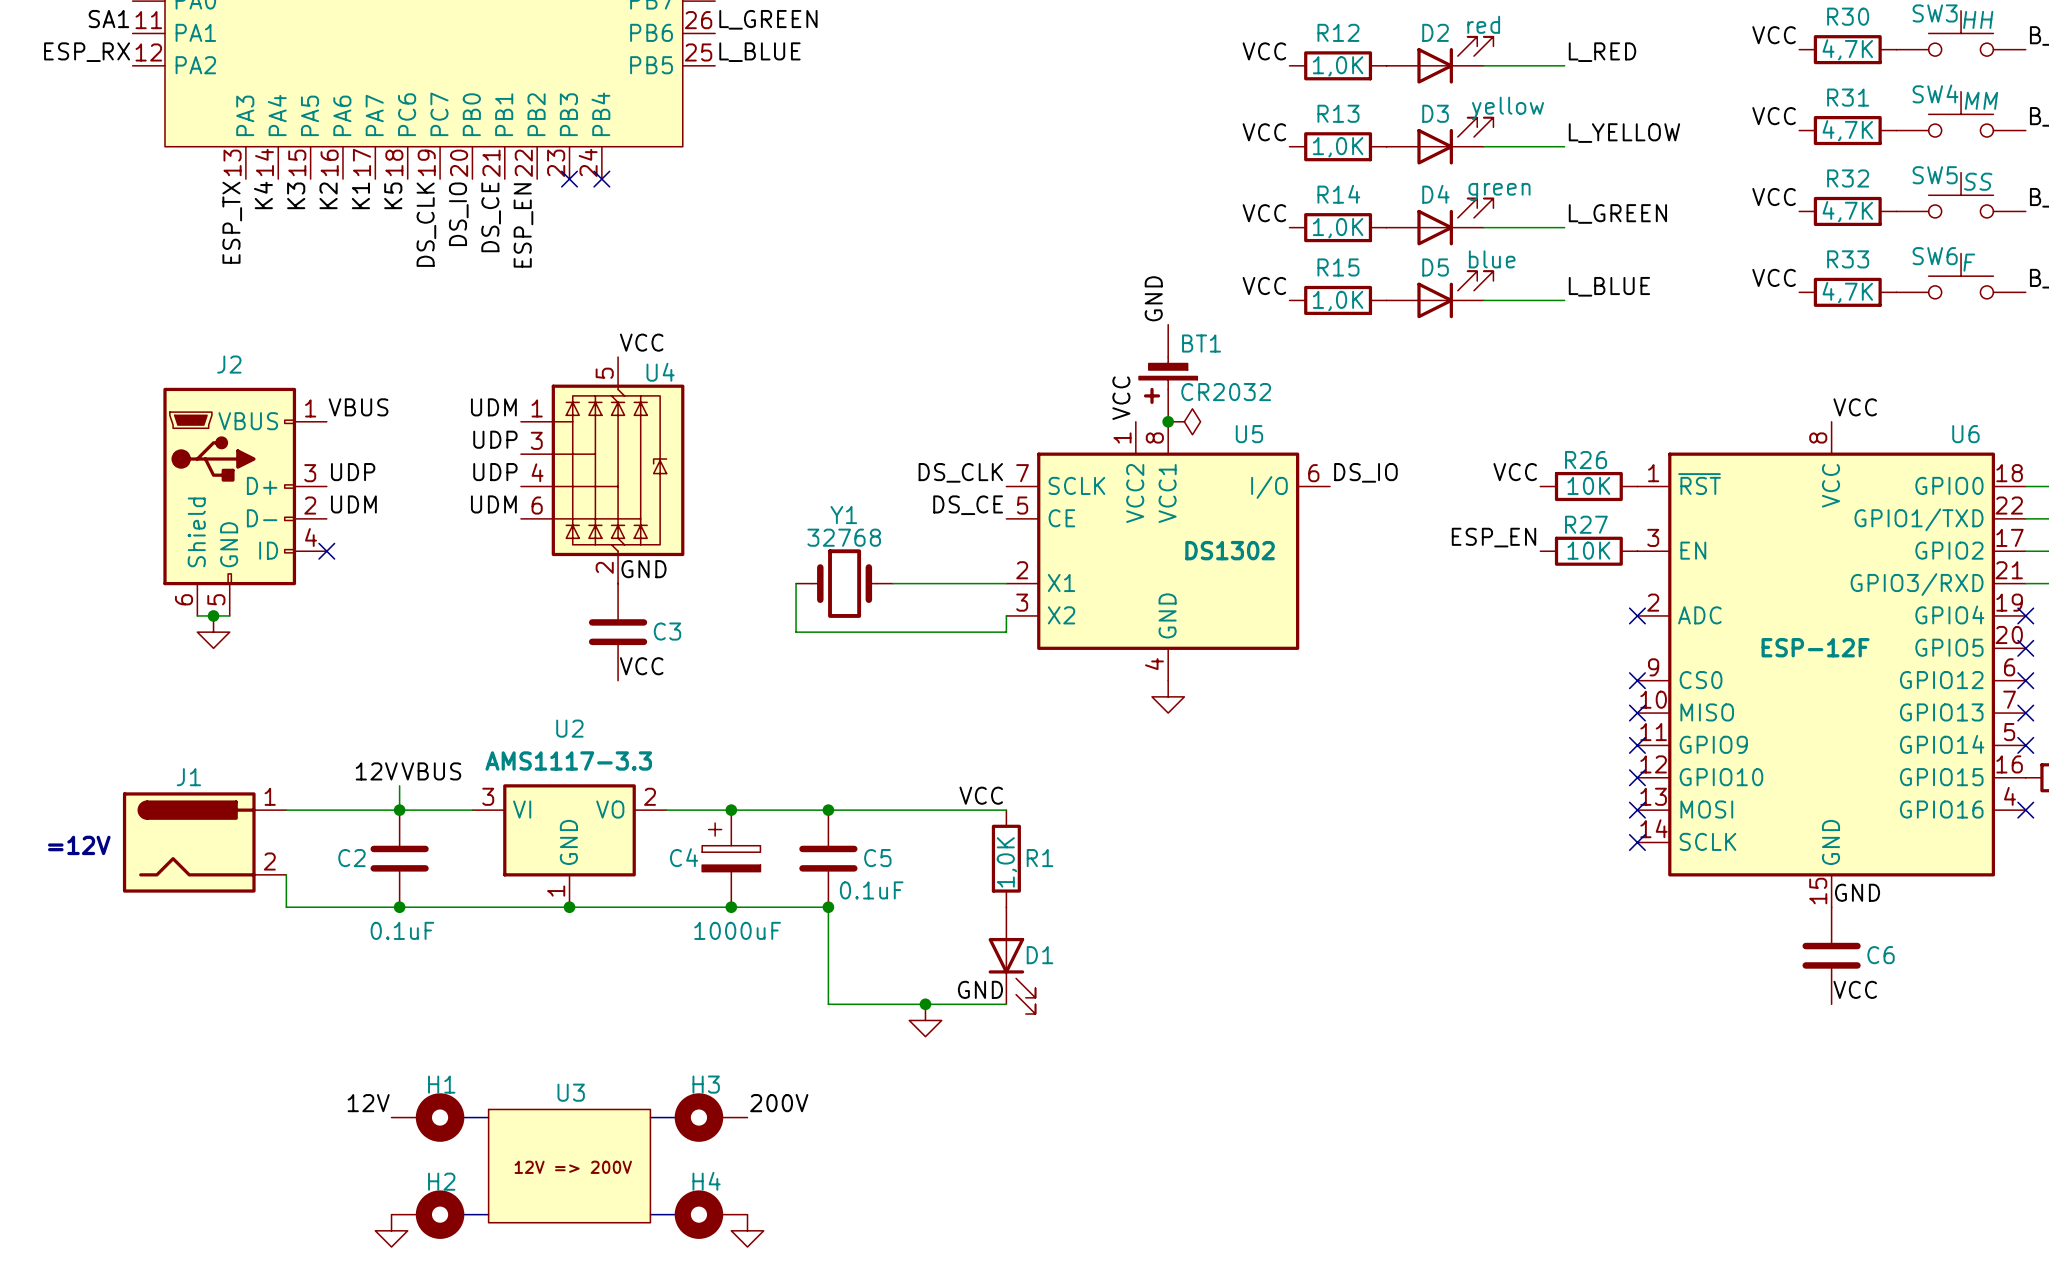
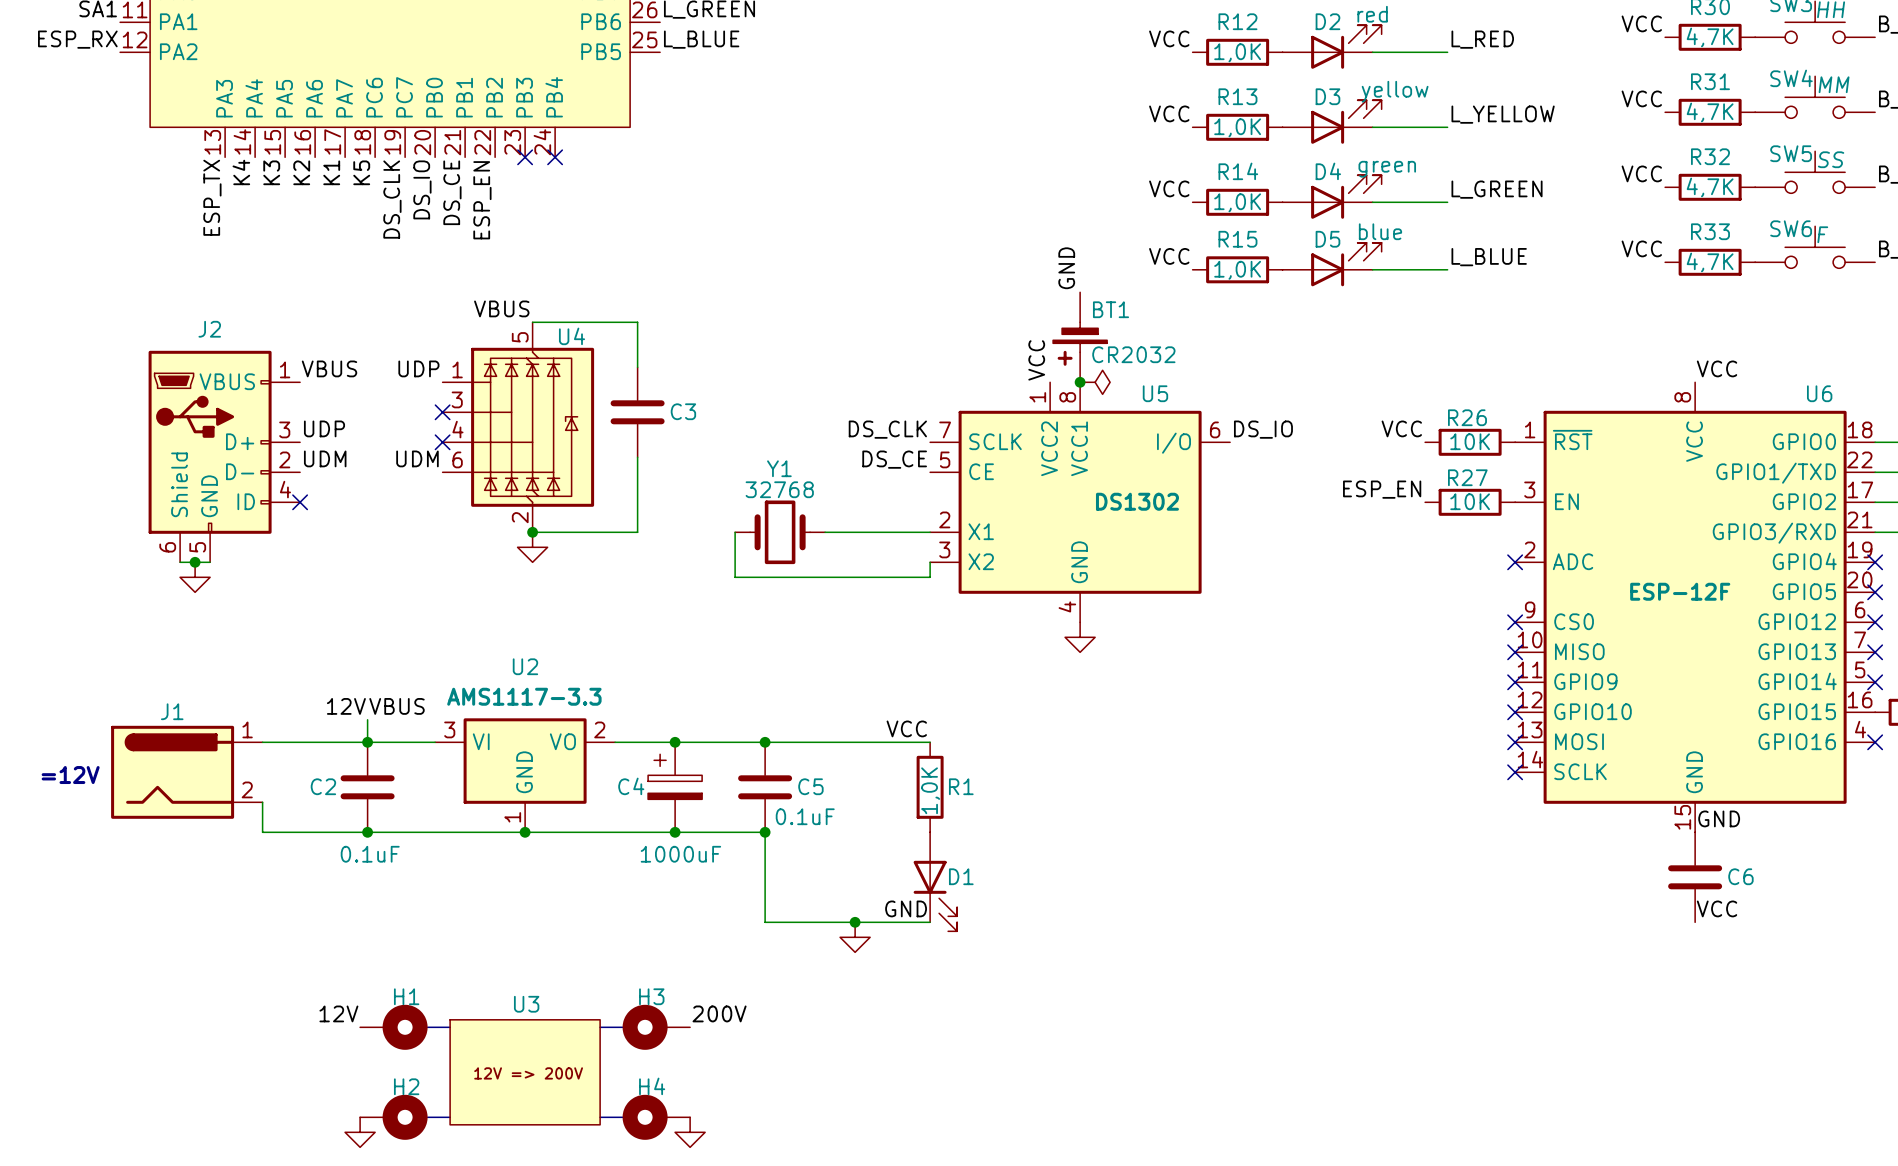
label: none -> VBUS (501, 308)
label: VCC (641, 342) -> none
wire: none -> (532, 322) (637, 322) (637, 367)
label: none -> UDP (418, 368)
label: UDM (493, 407) -> none
label: UDP (495, 439) -> none
no-connect mark: none -> (442, 412)
U4 position: (602, 470) -> (518, 427)
label: UDP (495, 472) -> none
no-connect mark: none -> (442, 442)
wire: none -> (637, 457) (637, 532) (532, 532)
label position: UDM (493, 504) -> UDM (417, 458)
label: GND (643, 569) -> none
junction: none -> (532, 532)
power symbol: none -> (532, 547)
C3 position: (618, 632) -> (637, 412)
label: VCC (641, 666) -> none

